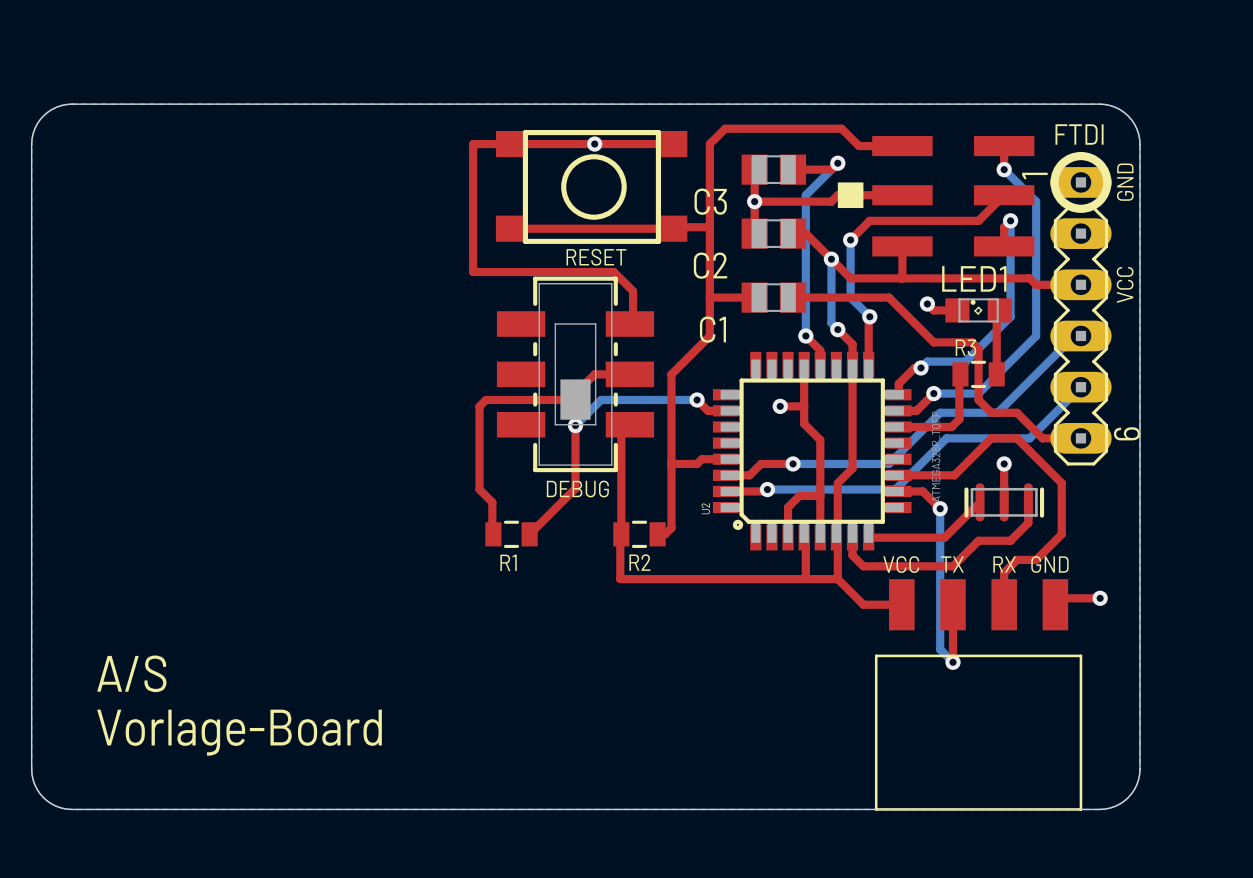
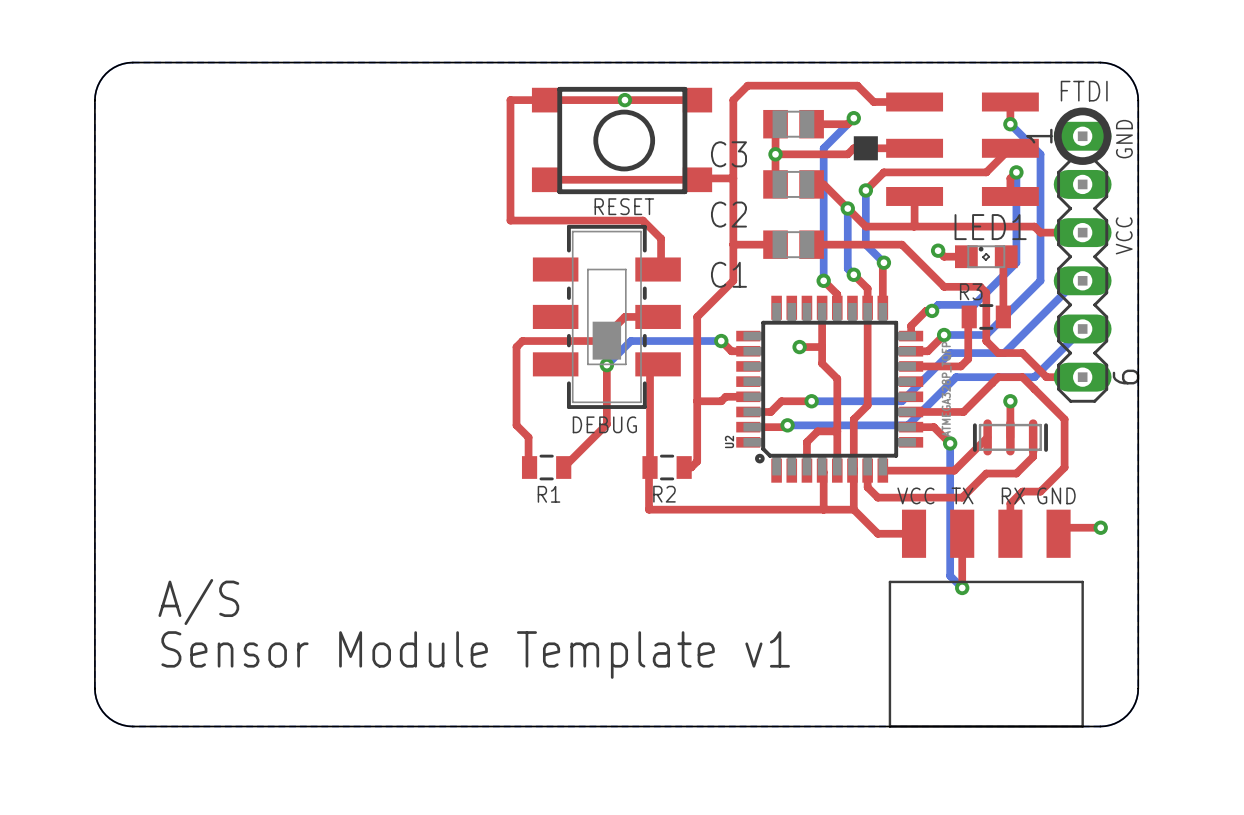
text: Vorlage-Board (239, 732) -> Sensor Module Template v1 (475, 655)

